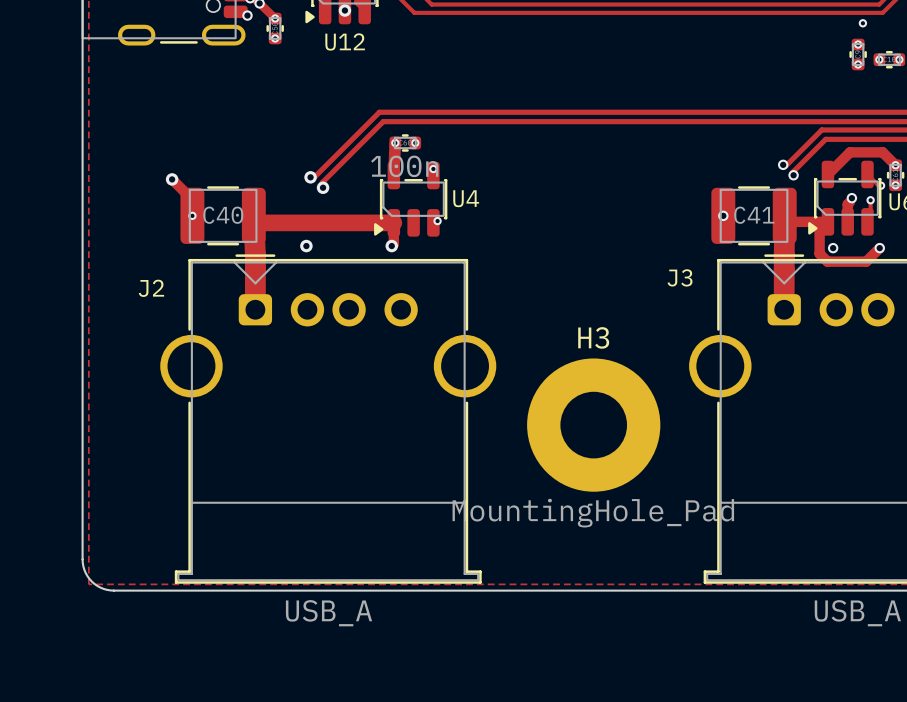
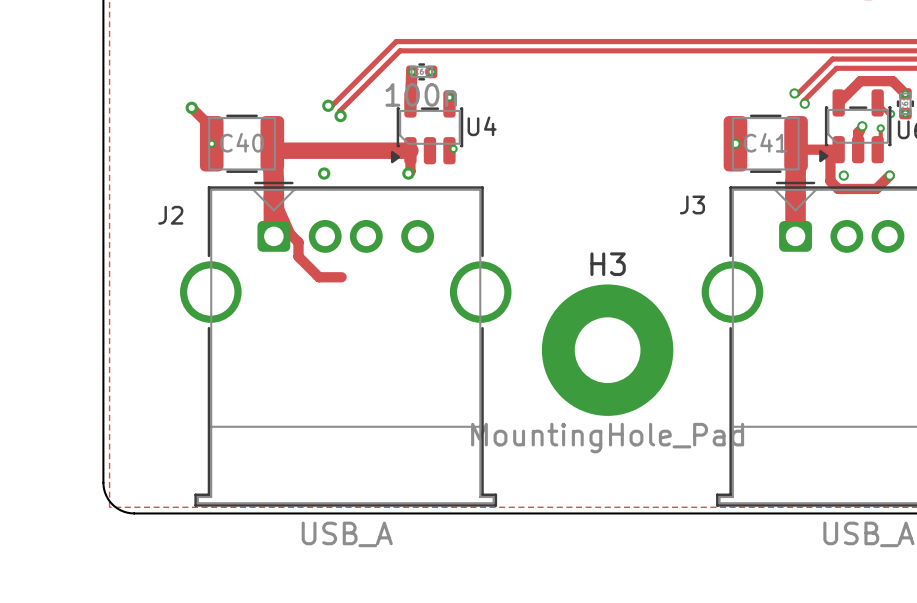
track: none -> (273, 197) (290, 234) (298, 242) (298, 256) (319, 277) (341, 277)

